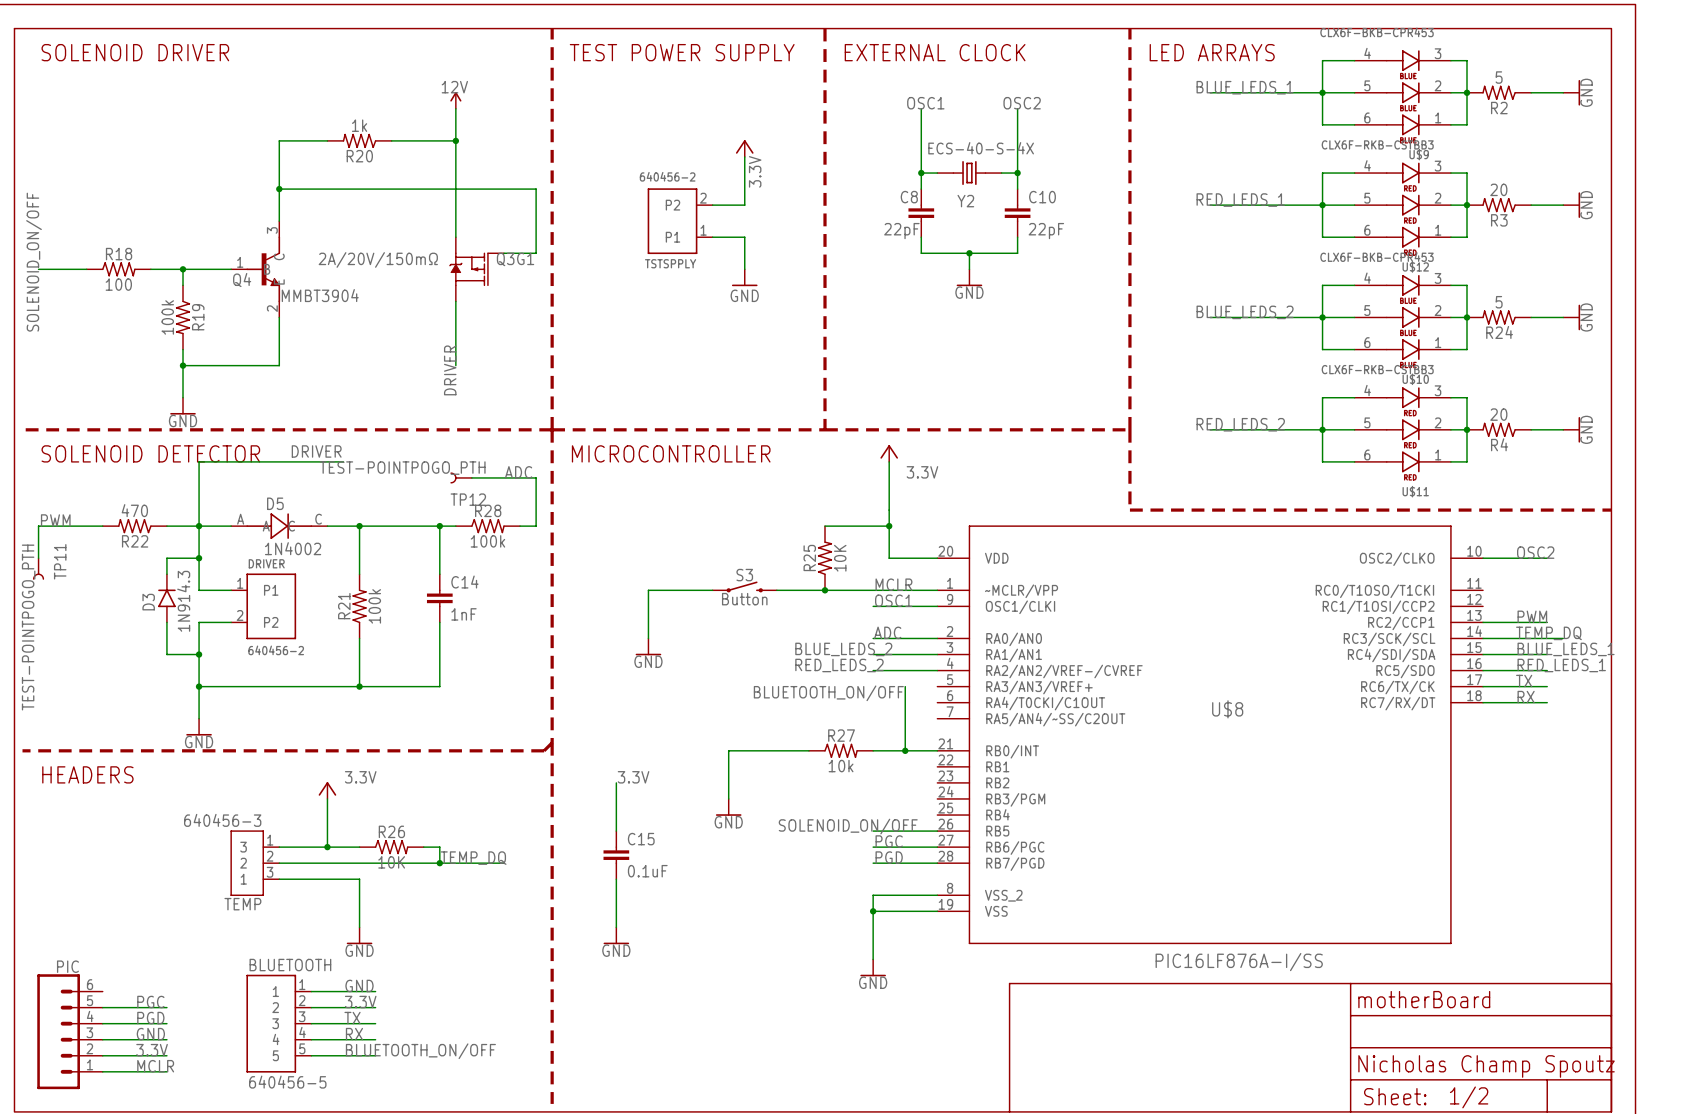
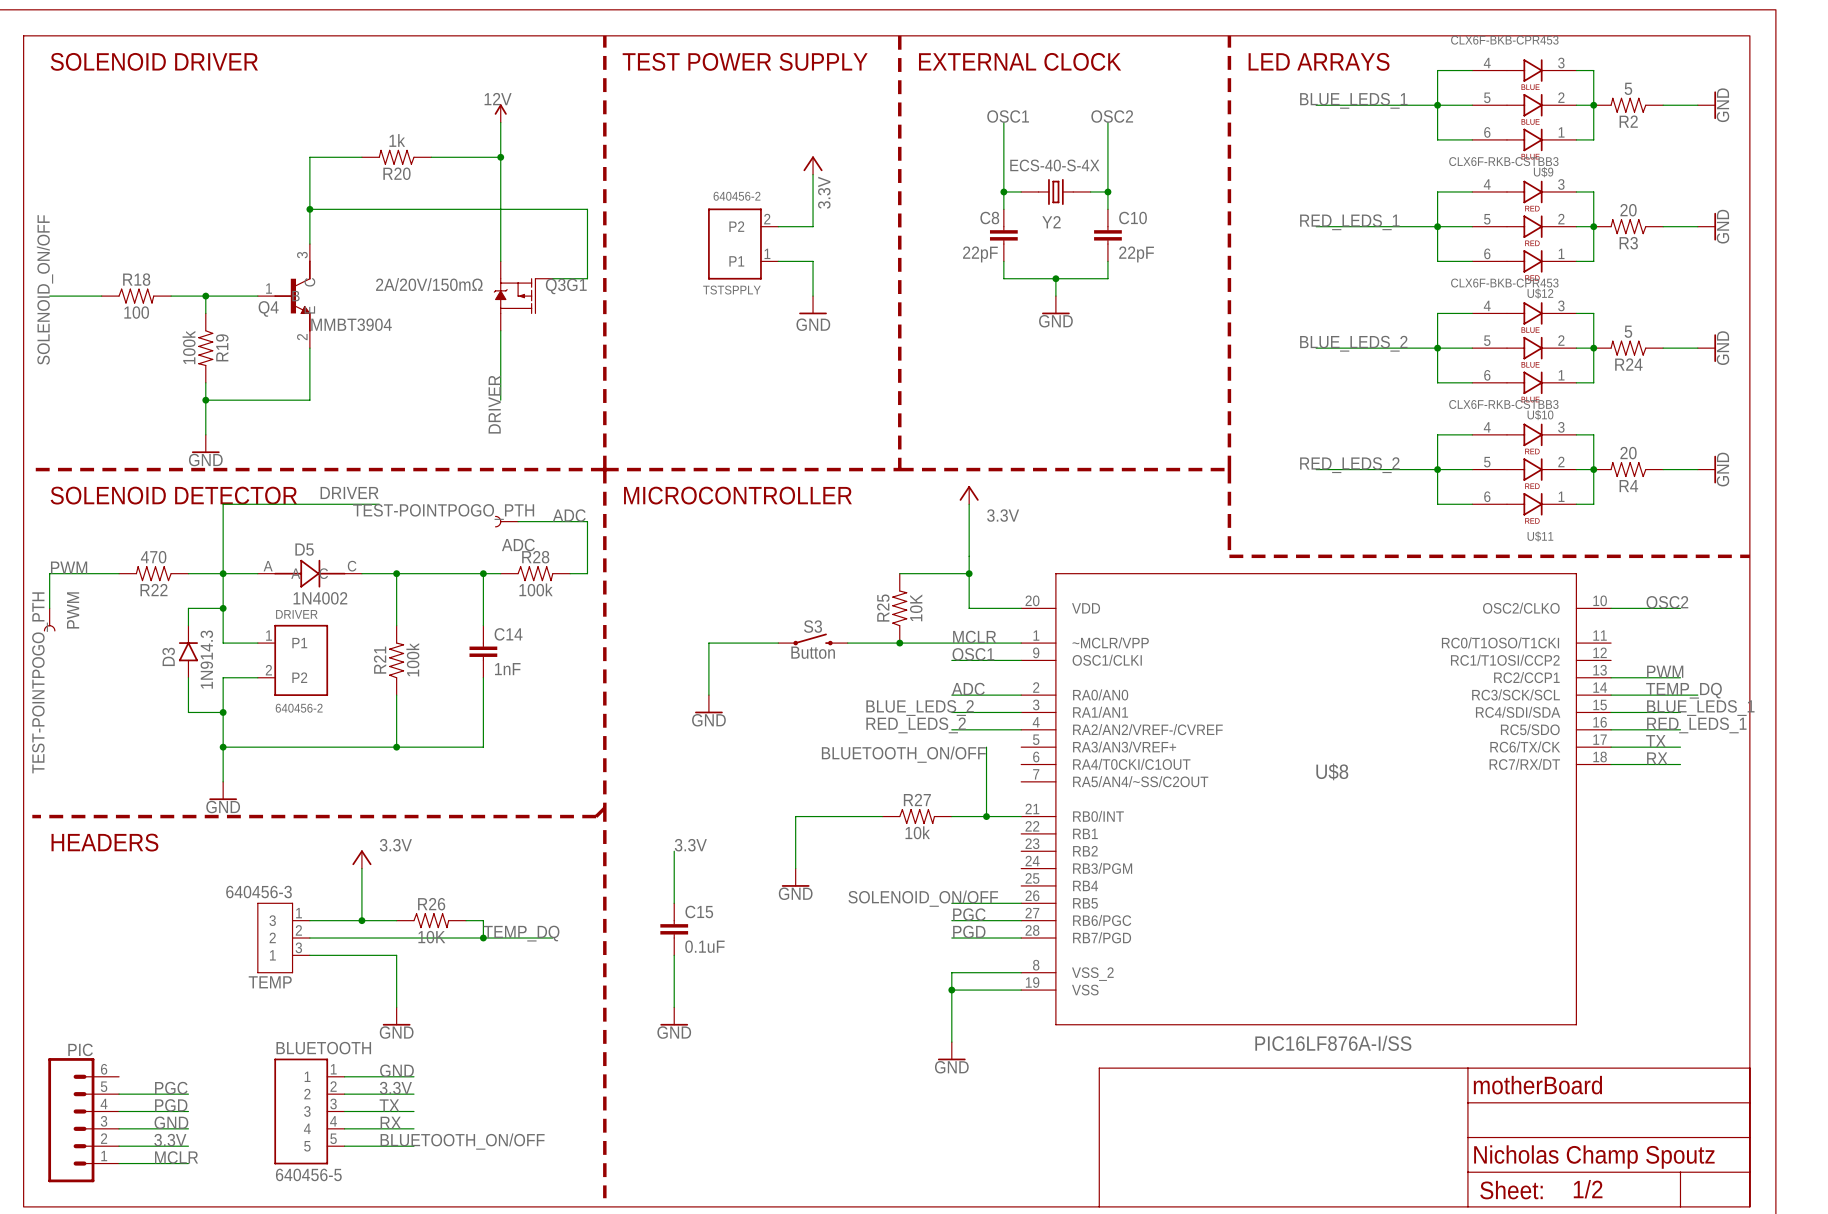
TP12 name: TP12 (468, 499) -> ADC (518, 545)
TP11 name: TP11 (60, 561) -> PWM (73, 610)

